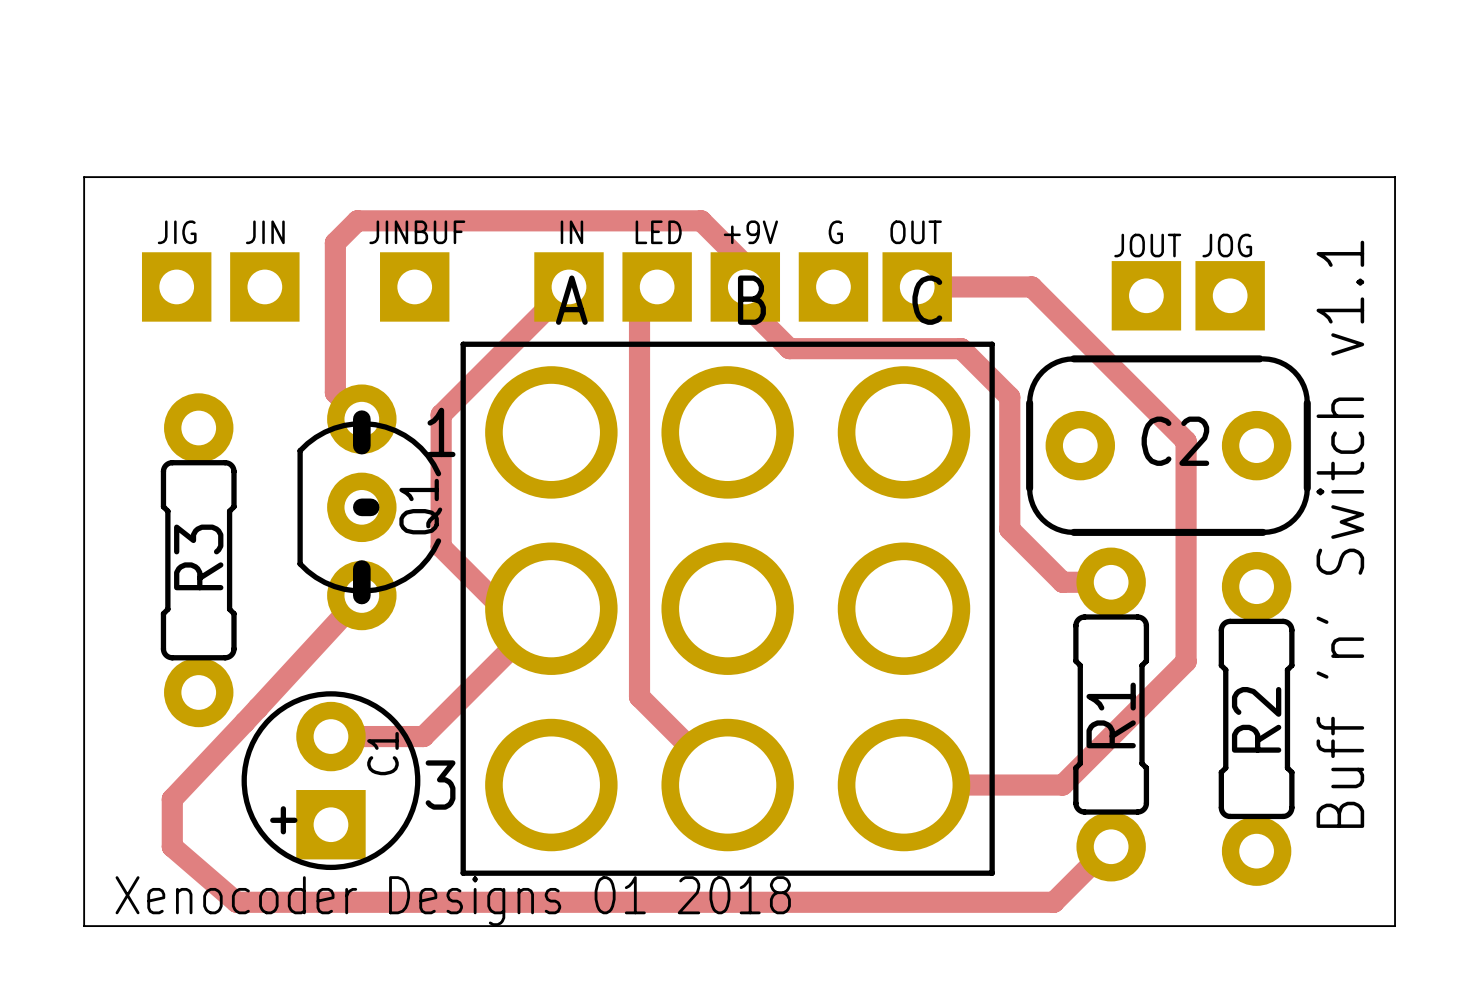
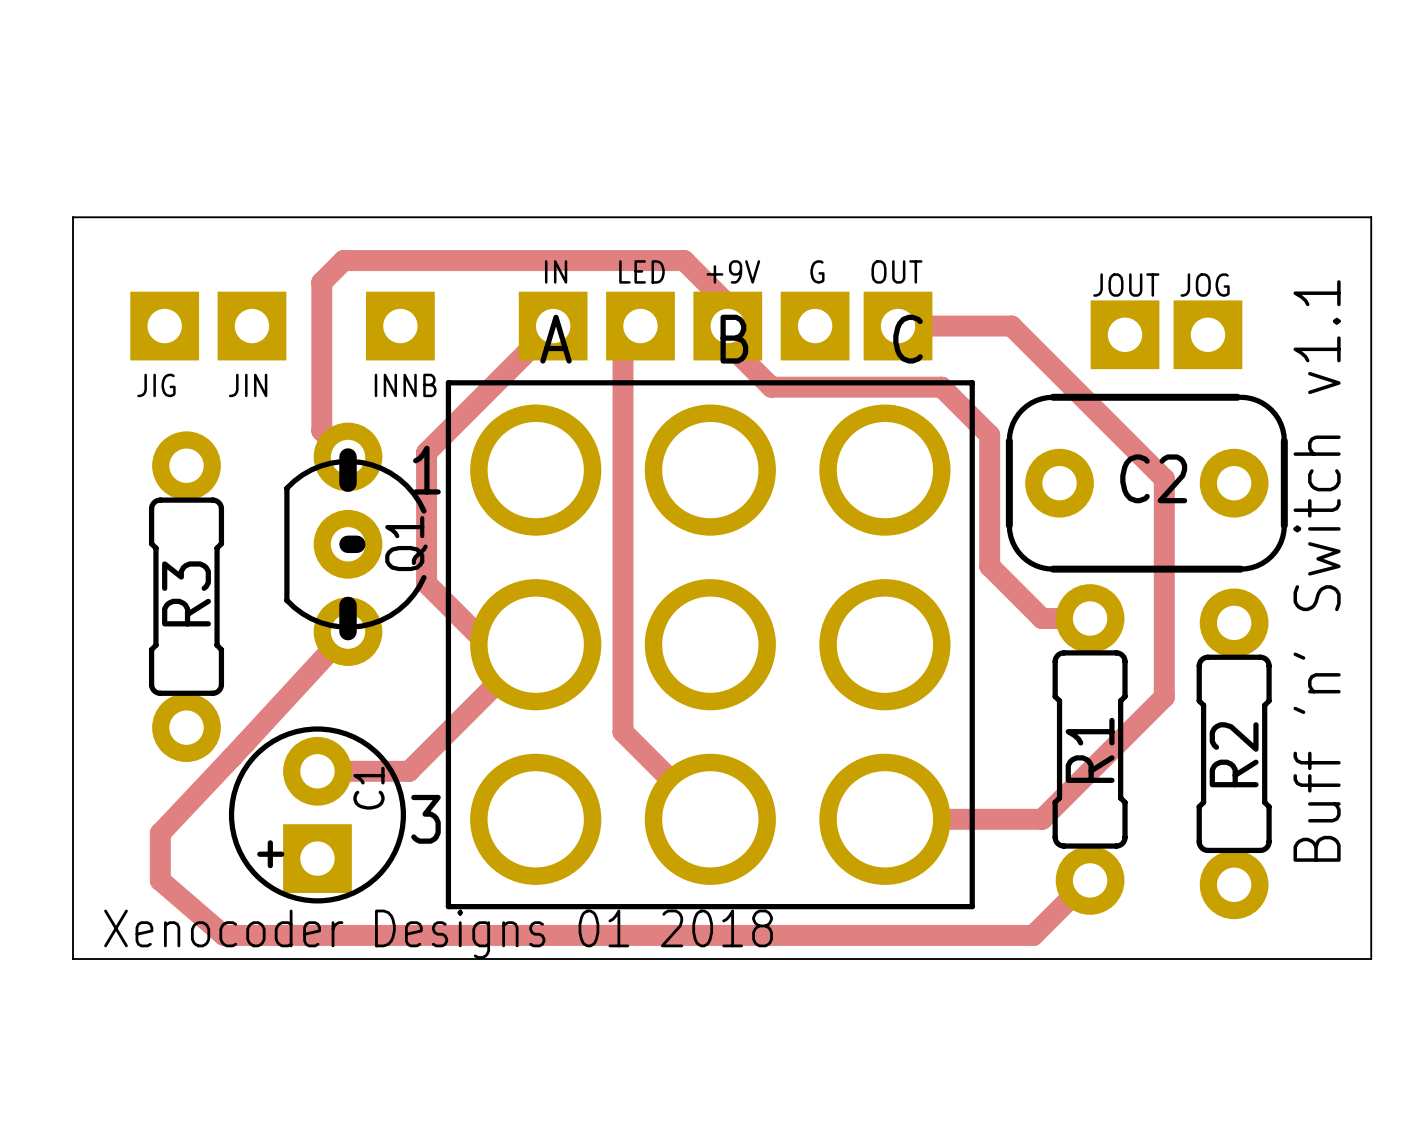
JIG name position: JIG (177, 232) -> JIG (156, 385)
JIN name position: JIN (265, 232) -> JIN (248, 385)
JINBUF name: JINBUF (417, 232) -> INNB (405, 385)

